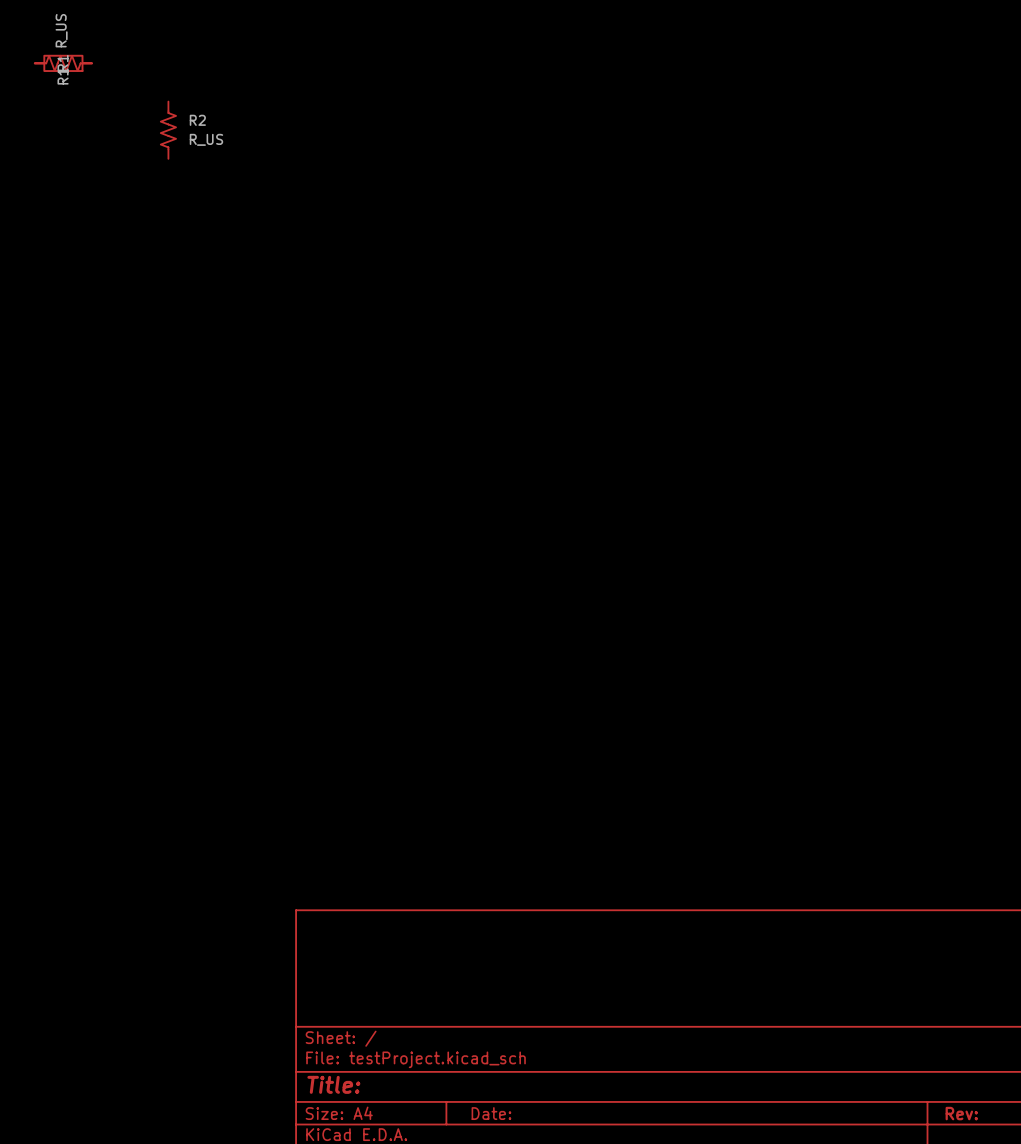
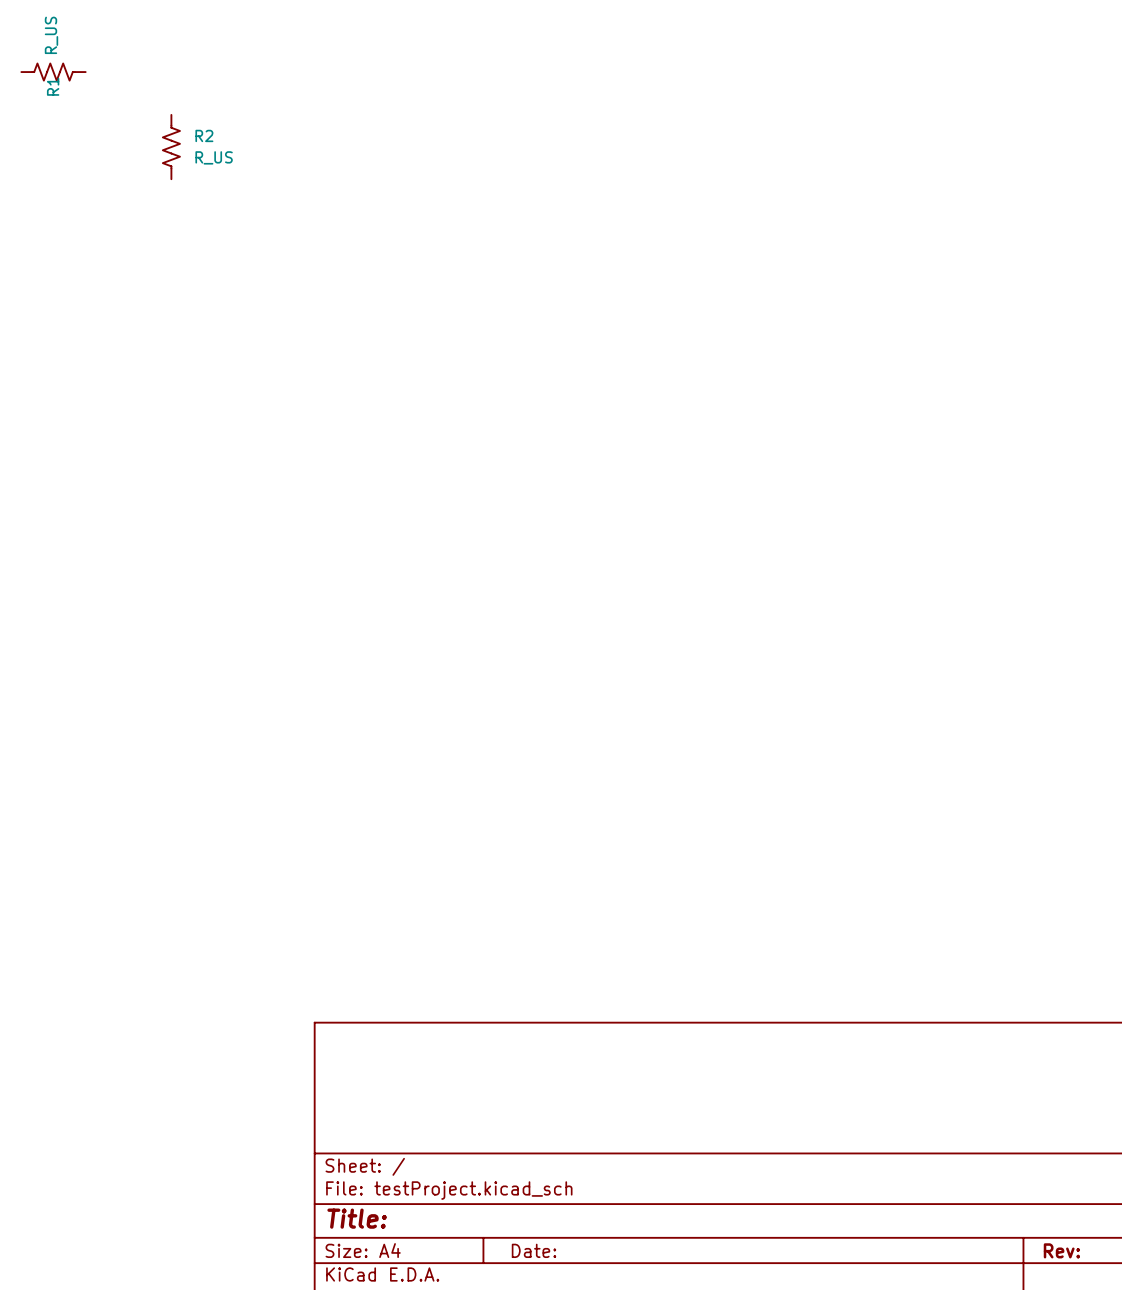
R1: (63, 63) -> none

